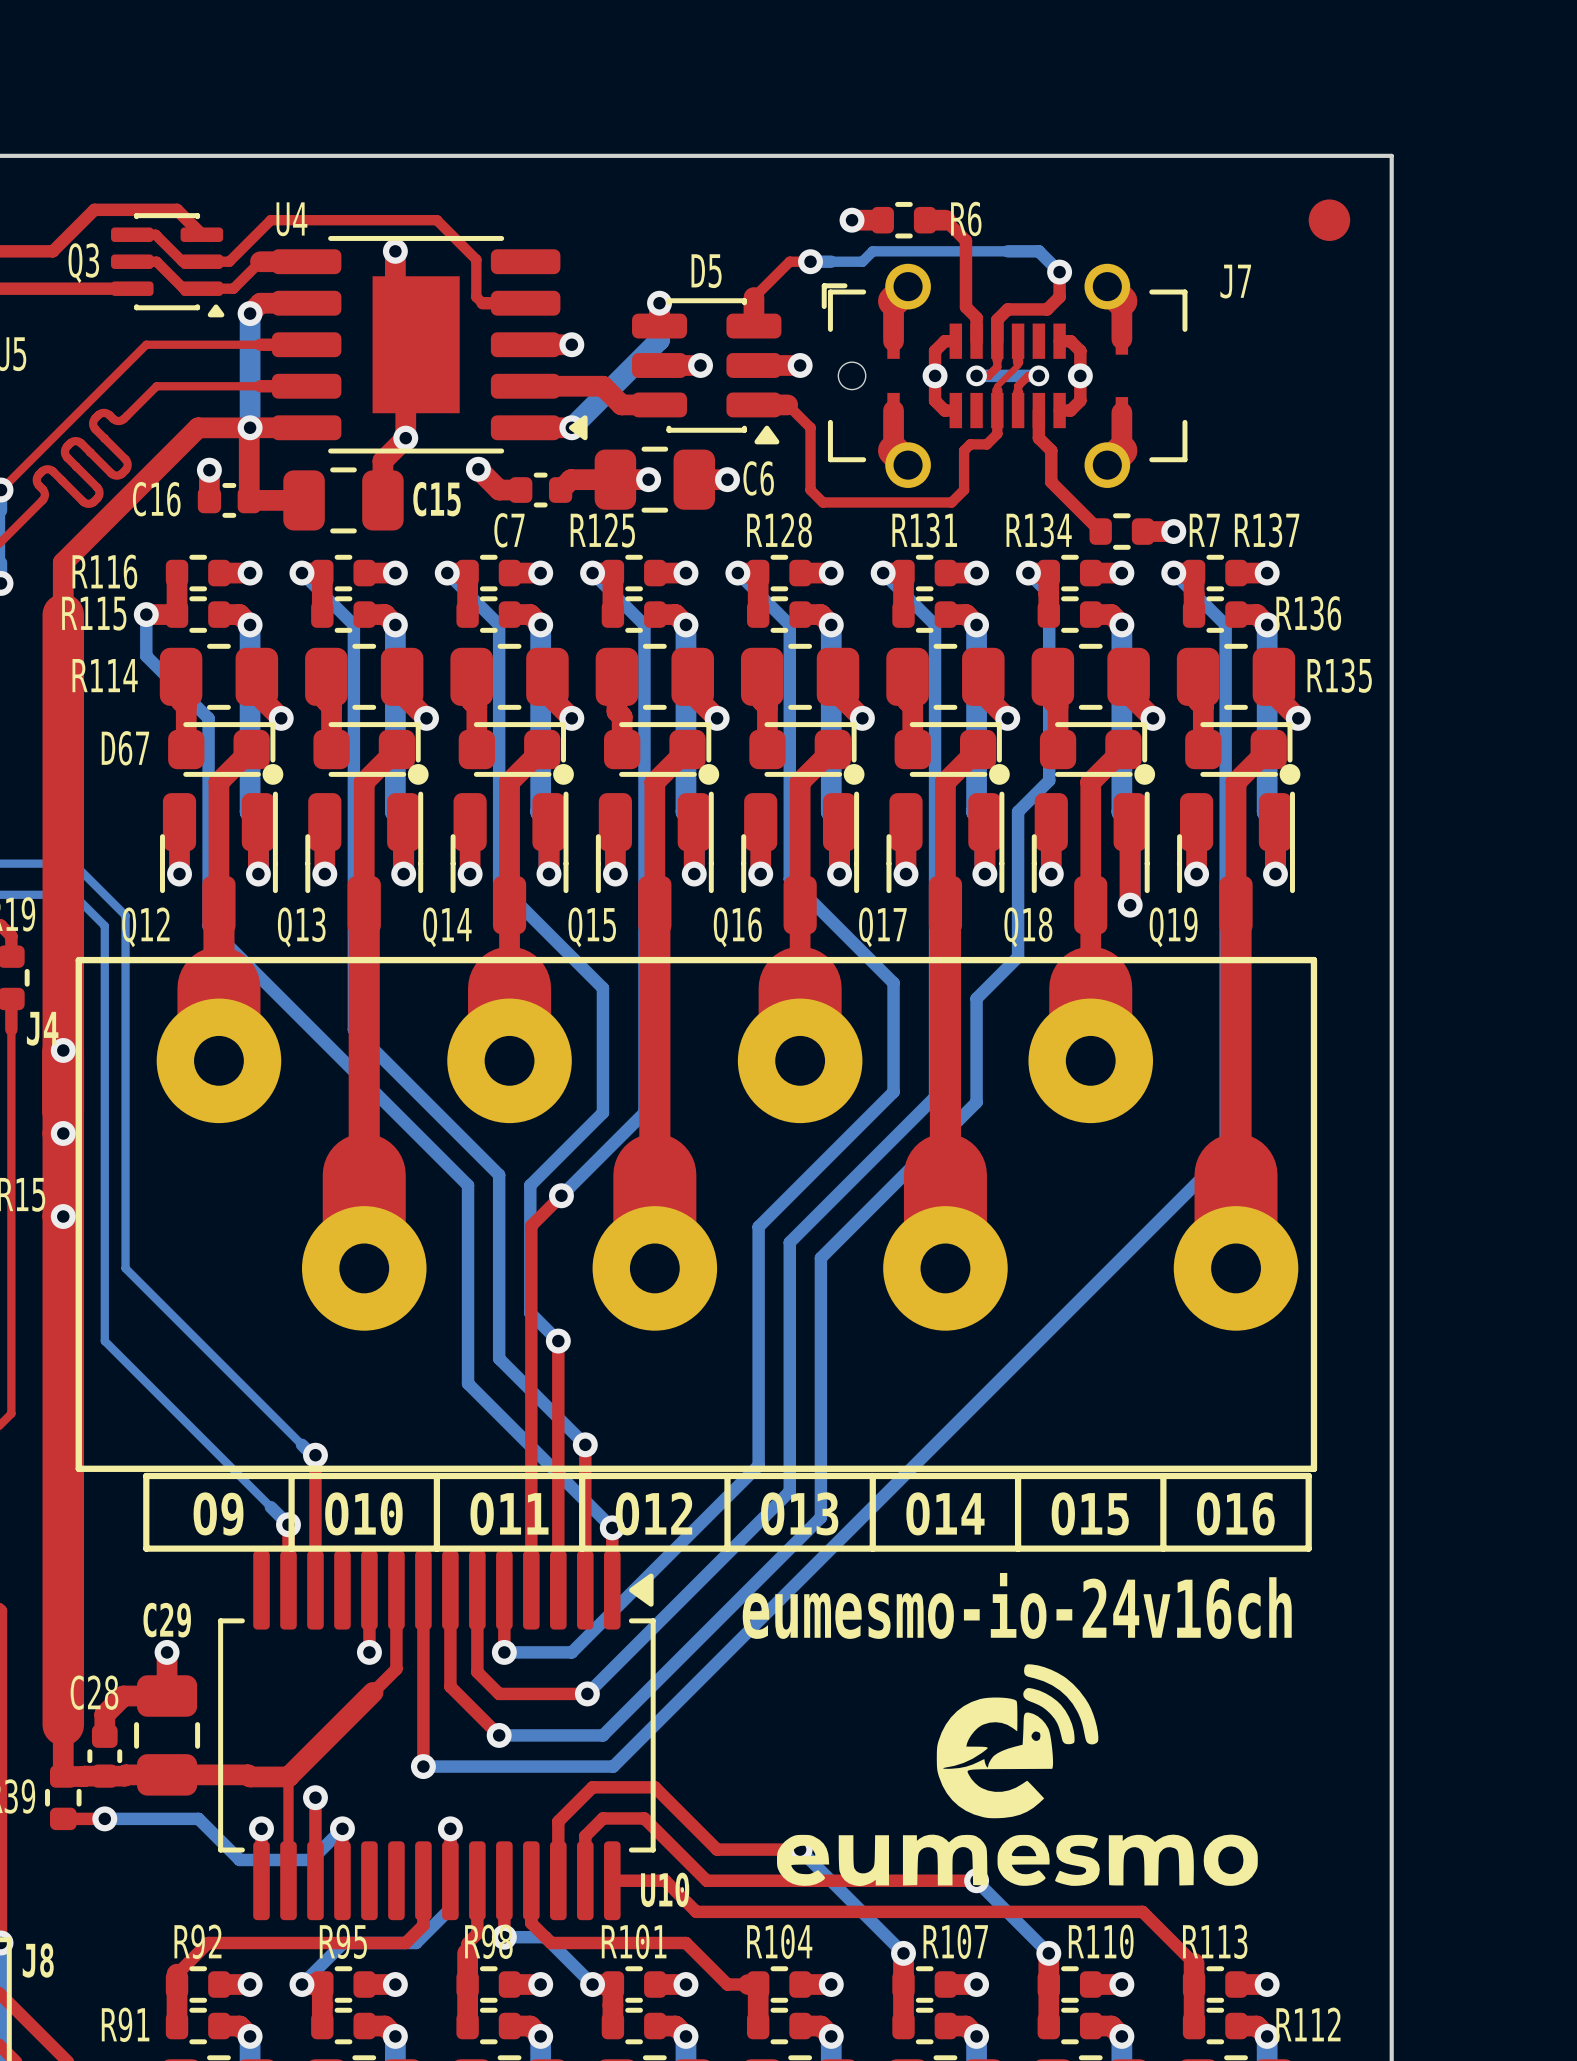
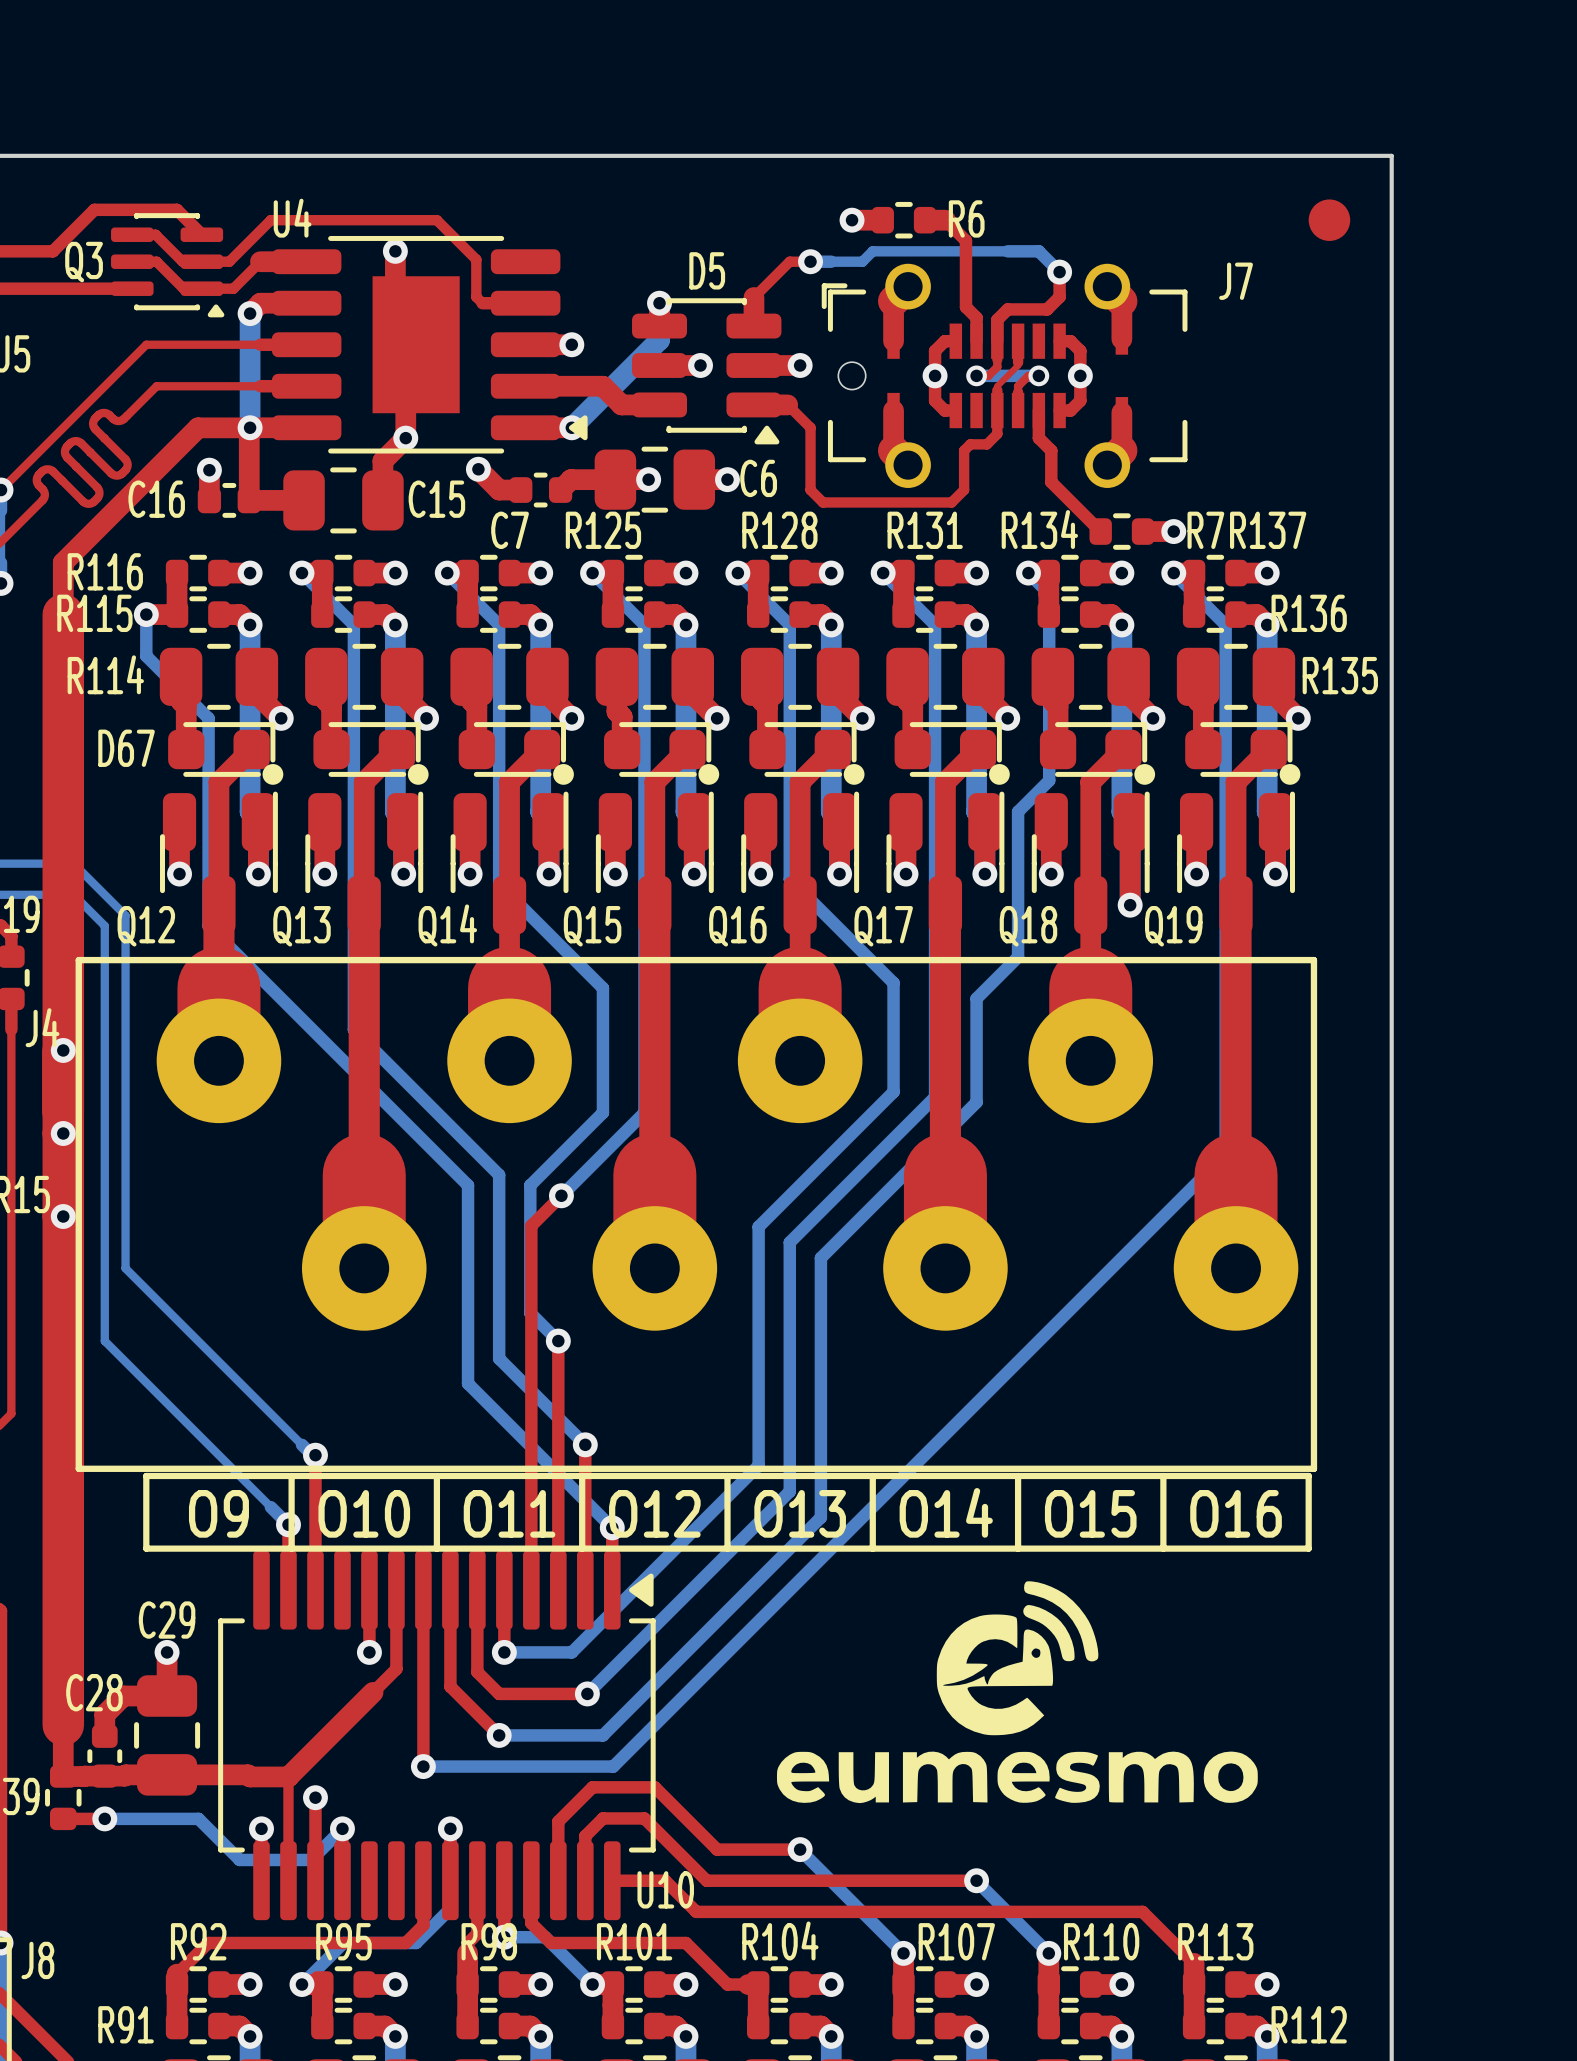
text: eumesmo-io-24v16ch (1017, 1605) -> none
drawing position: (1017, 1775) -> (1017, 1692)

